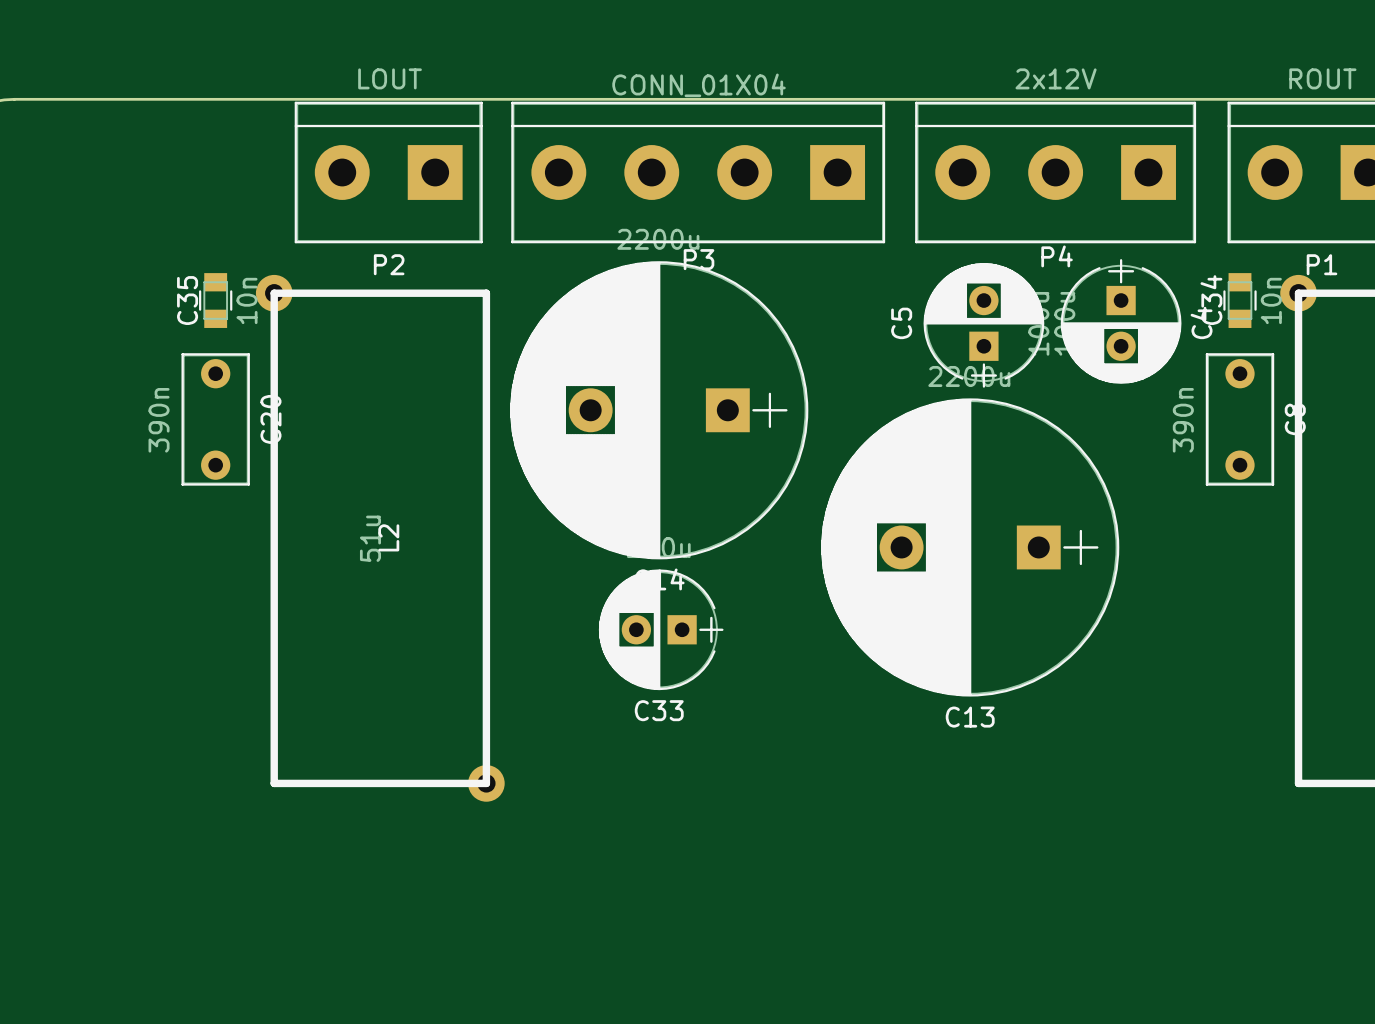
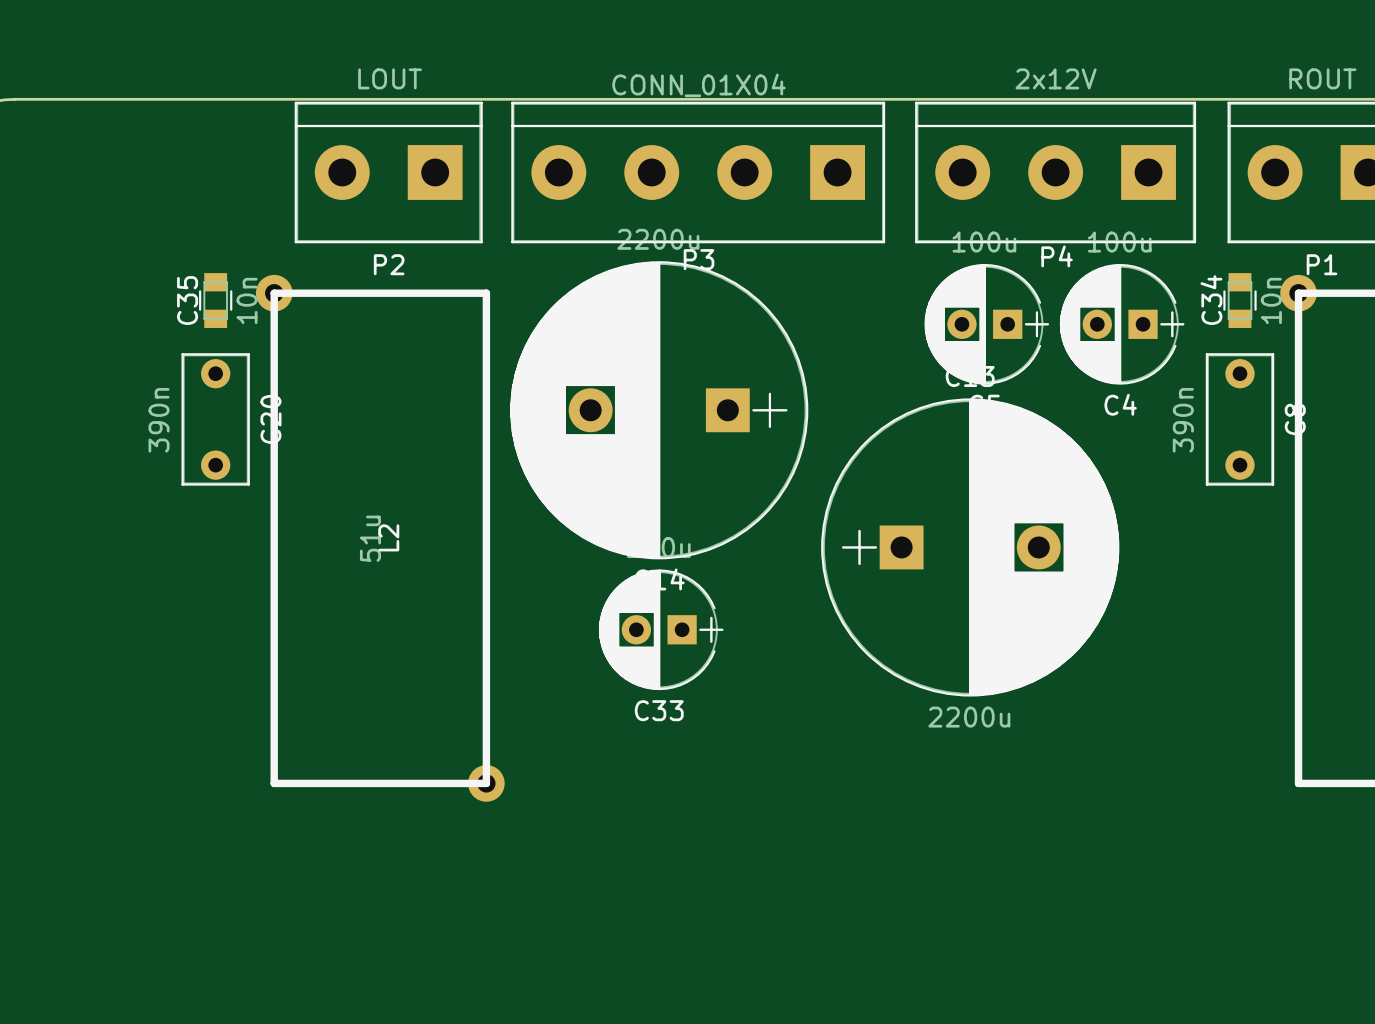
C4 rotation: 0° (1121, 321) -> 90° clockwise (1122, 324)
C5 rotation: 0° (983, 325) -> 90° counterclockwise (986, 324)
C13 rotation: 0° (970, 547) -> 180° (970, 547)

